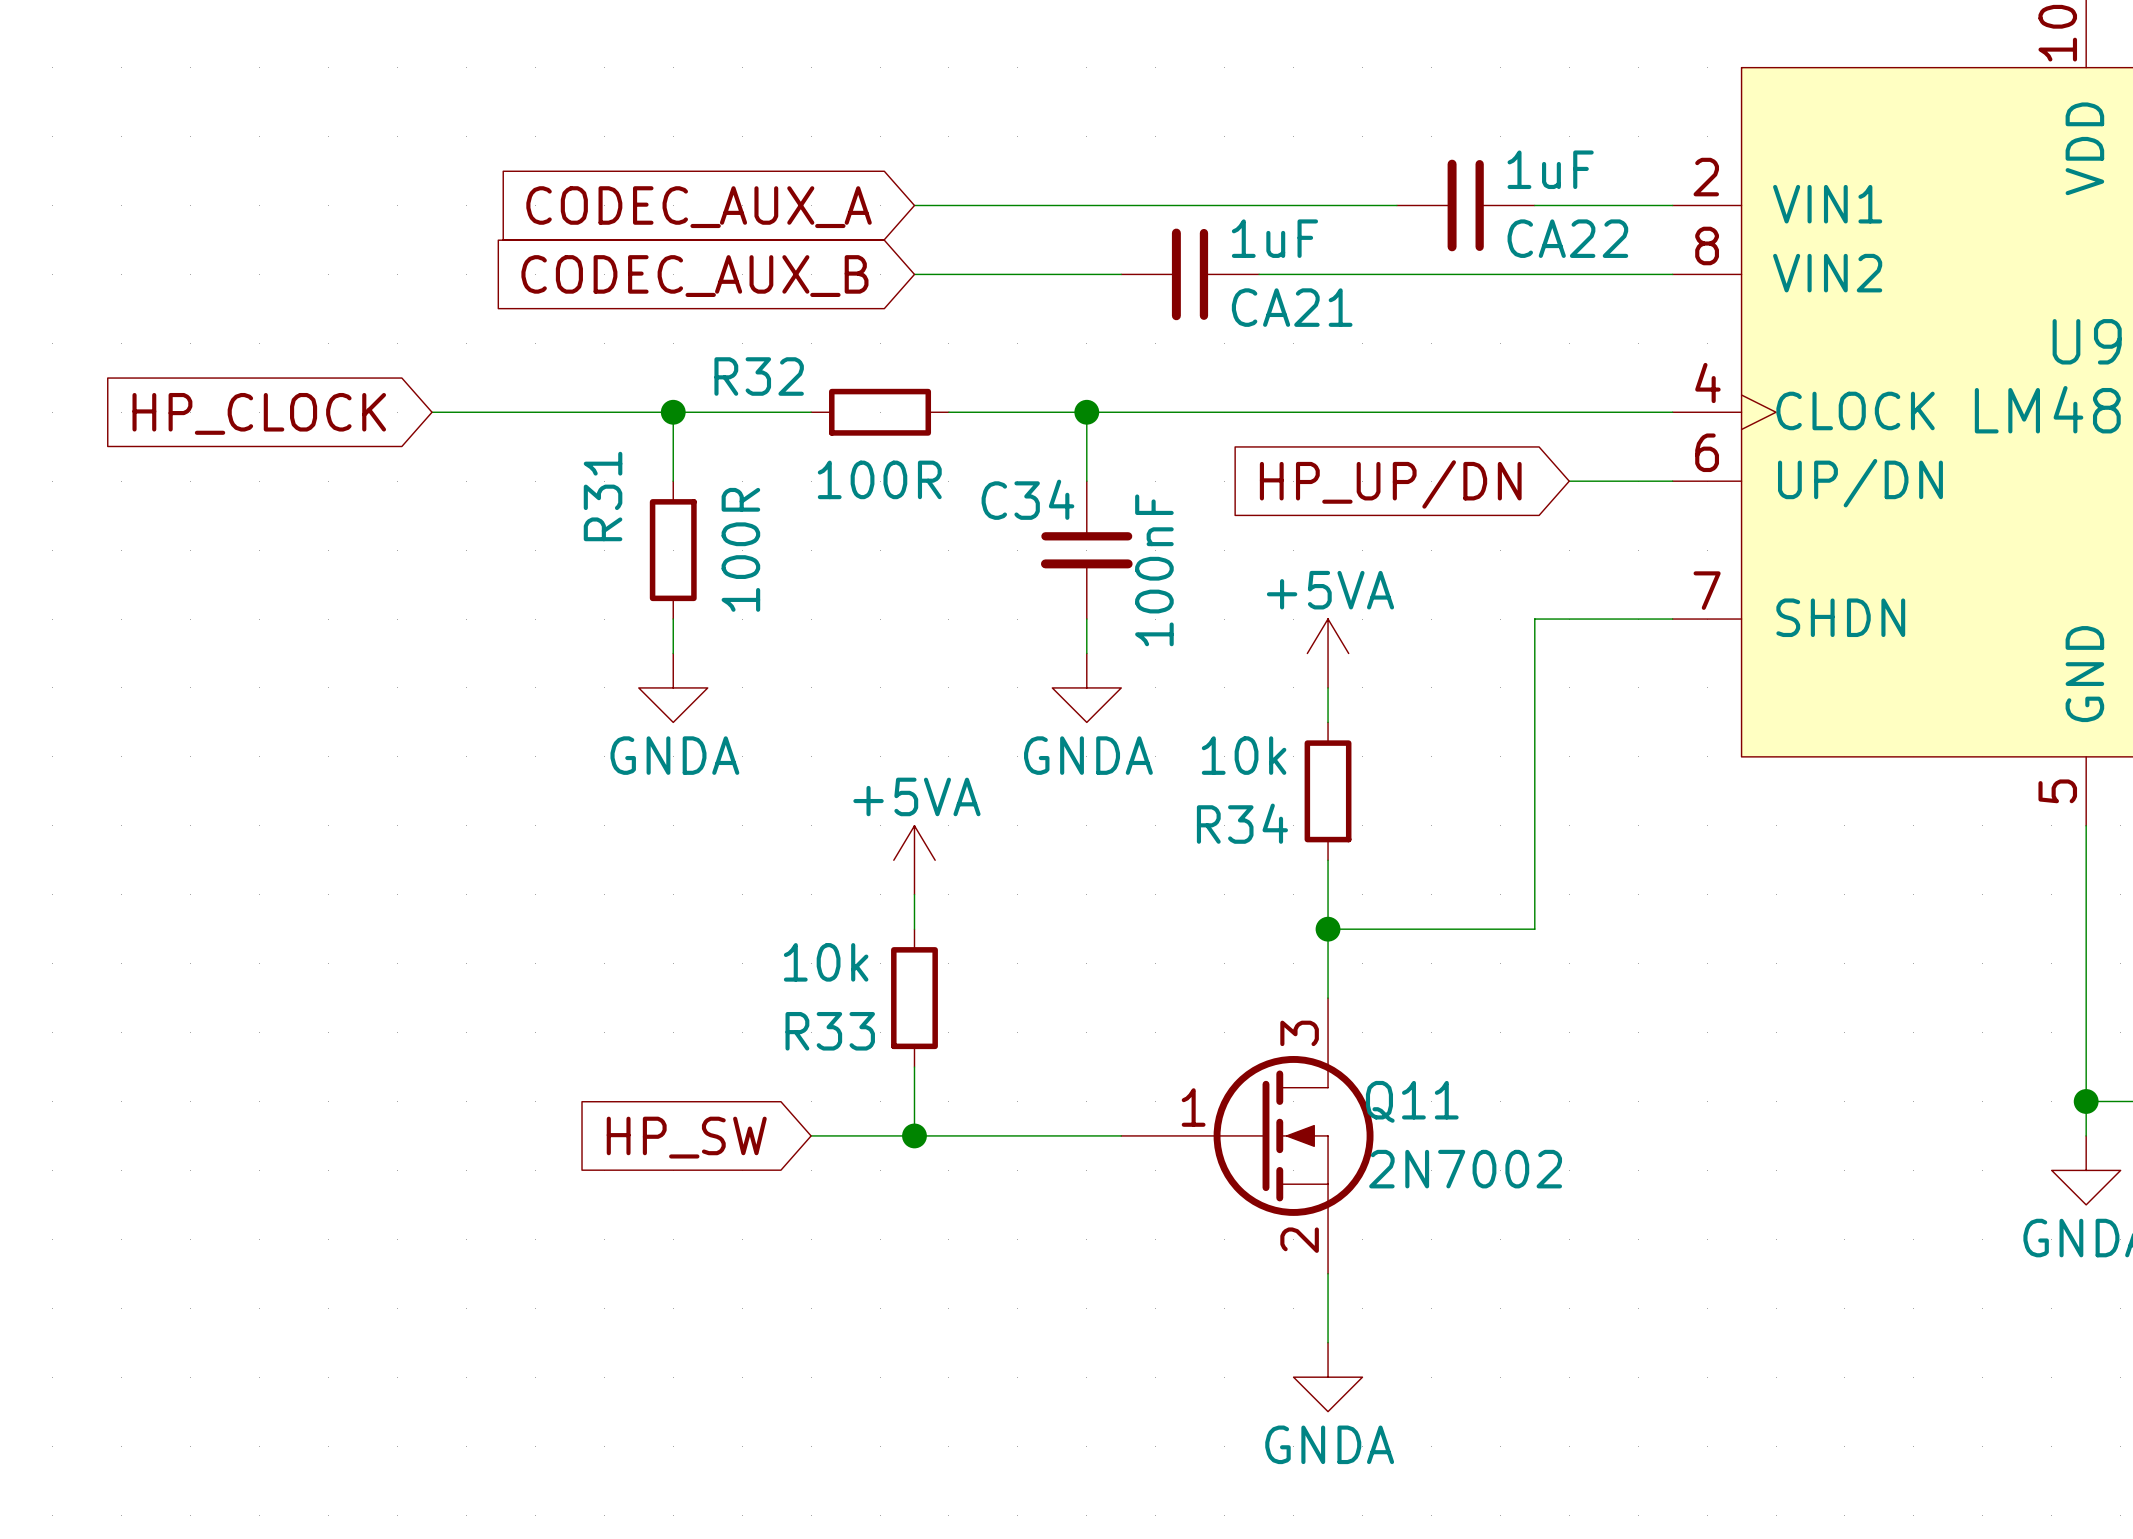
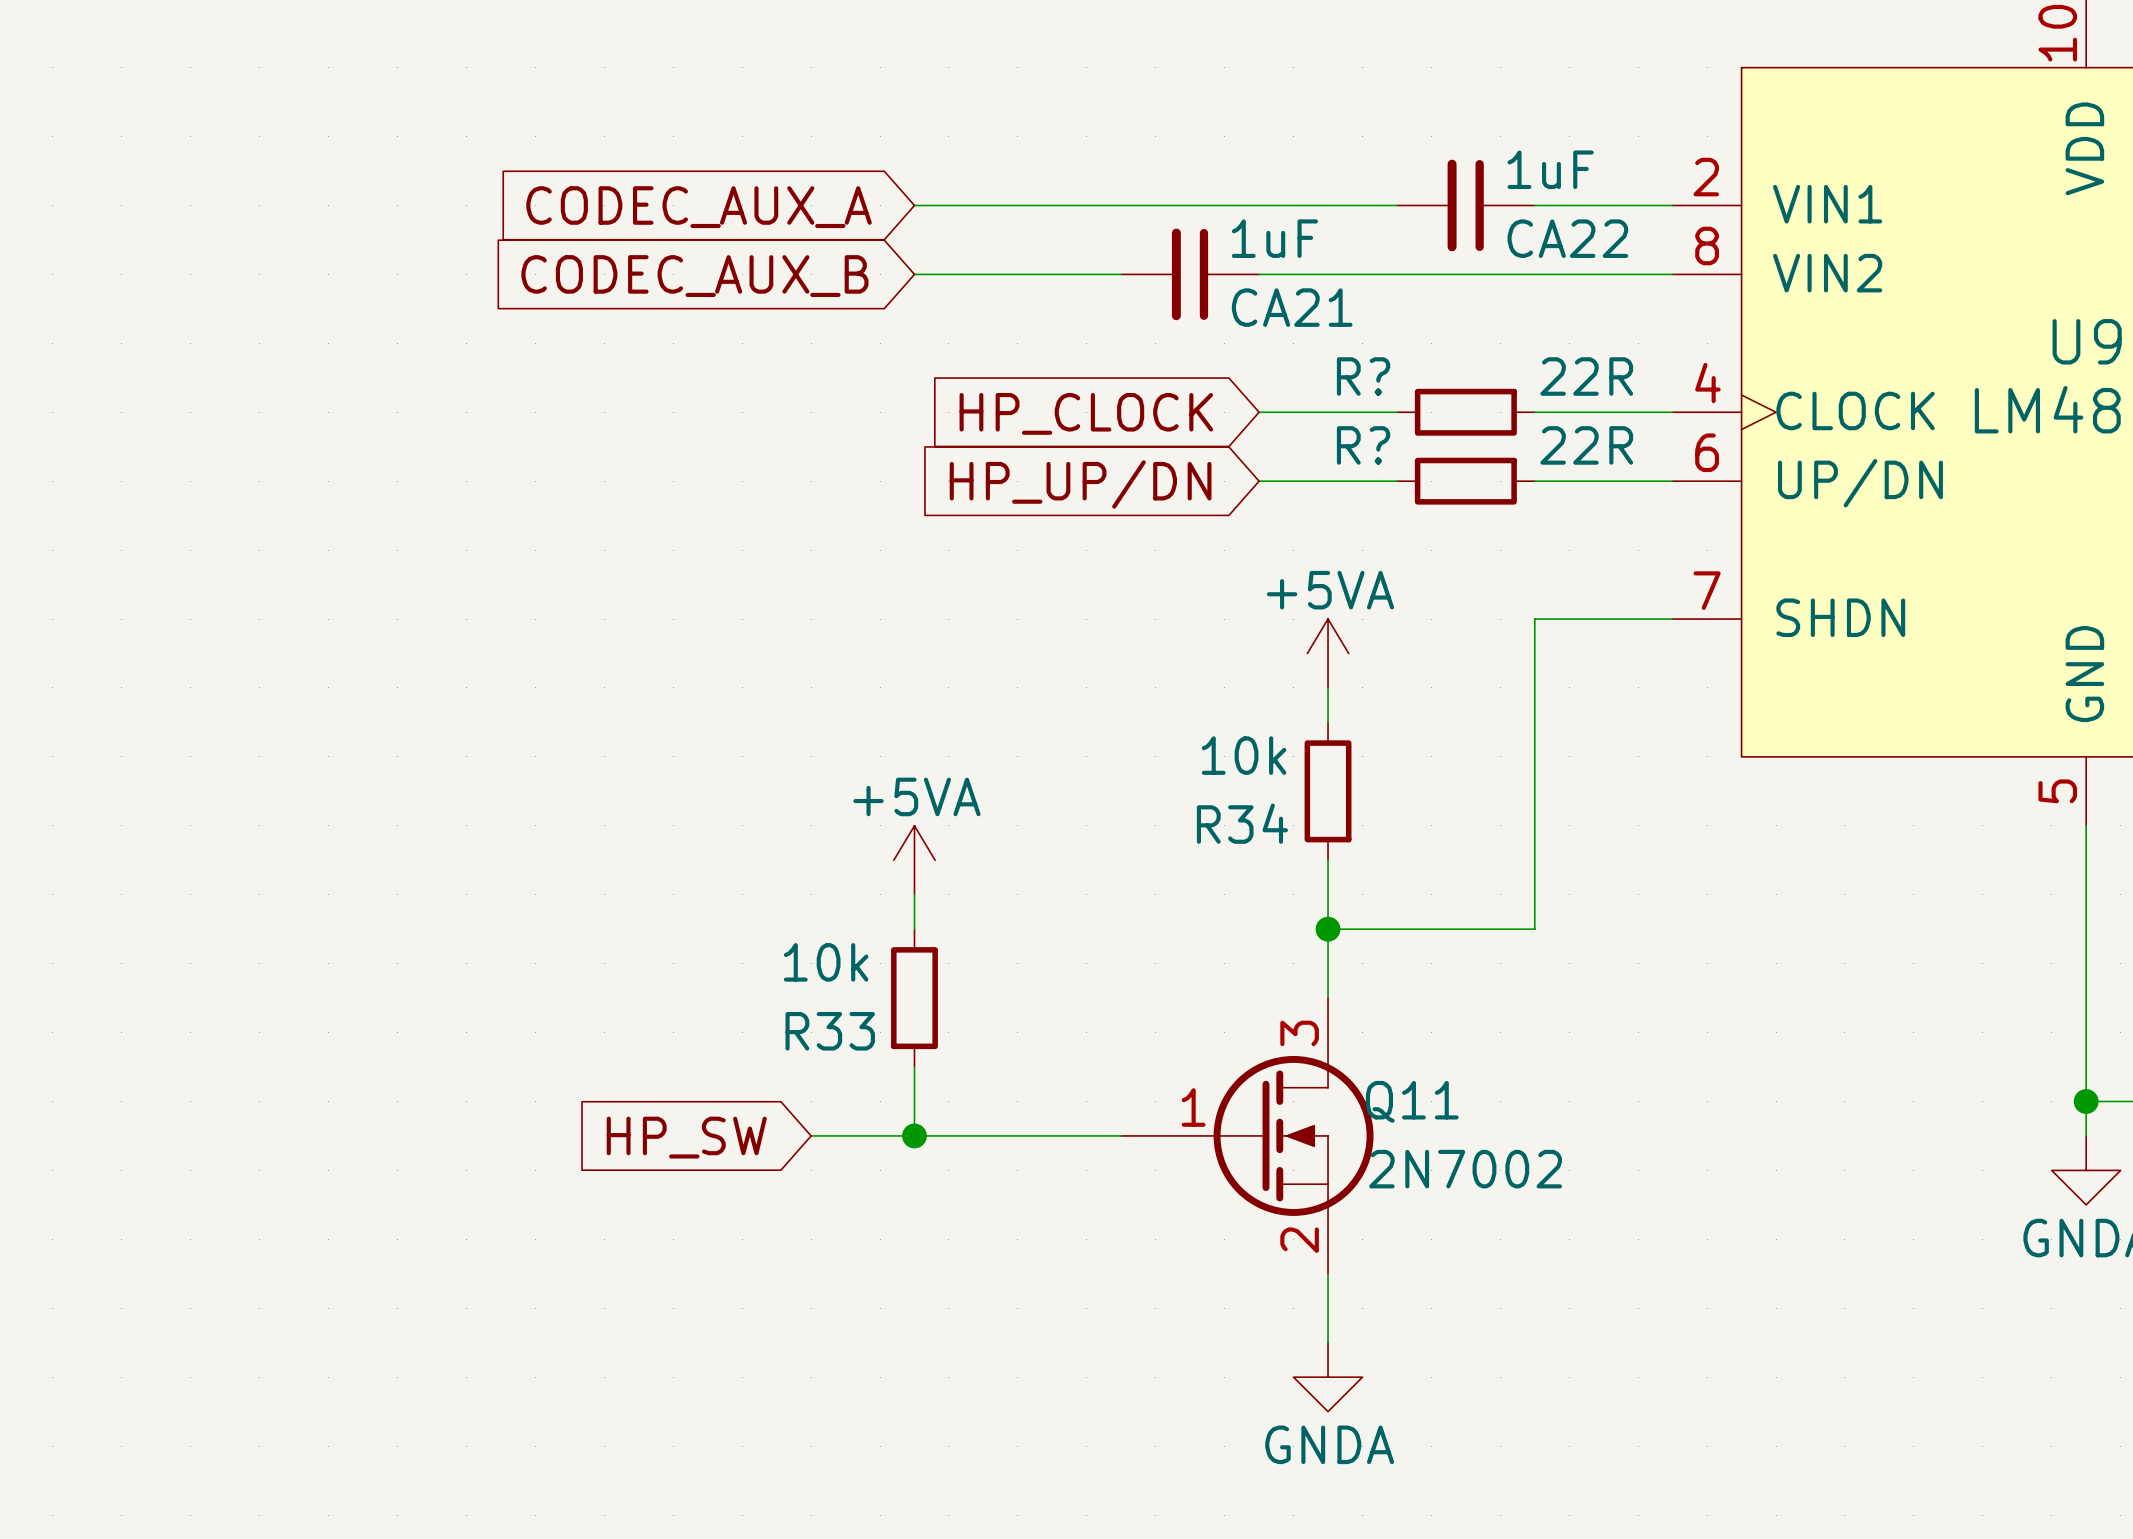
wire: (432, 412) (811, 412) -> none
wire: (673, 412) (673, 481) -> none
junction: (673, 412) -> none
R32: 100R (880, 412) -> none
wire: (948, 412) (1259, 412) -> none
wire: (1086, 412) (1086, 481) -> none
junction: (1086, 412) -> none
wire: (1396, 412) (1534, 412) -> (1259, 481) (1396, 481)
R?: none -> 22R (1465, 412)
global label: HP_CLOCK (259, 413) -> none
global label: none -> HP_CLOCK (1086, 413)
R?: none -> 22R (1465, 481)
wire: none -> (1534, 481) (1569, 481)
global label position: HP_UP/DN (1390, 484) -> HP_UP/DN (1080, 484)
R31: 100R (673, 550) -> none
C34: 100nF (1086, 550) -> none
wire: (673, 619) (673, 653) -> none
wire: (1086, 619) (1086, 653) -> none
power symbol: GNDA (673, 687) -> none
power symbol: GNDA (1086, 687) -> none

